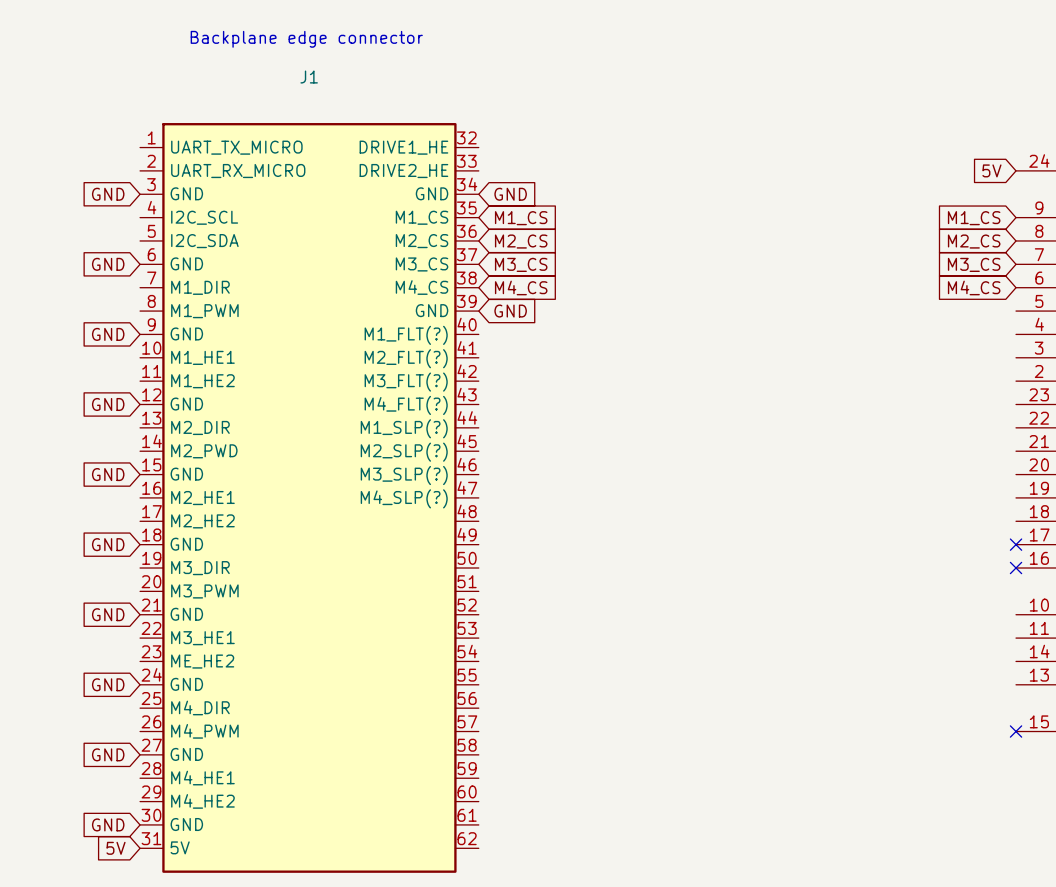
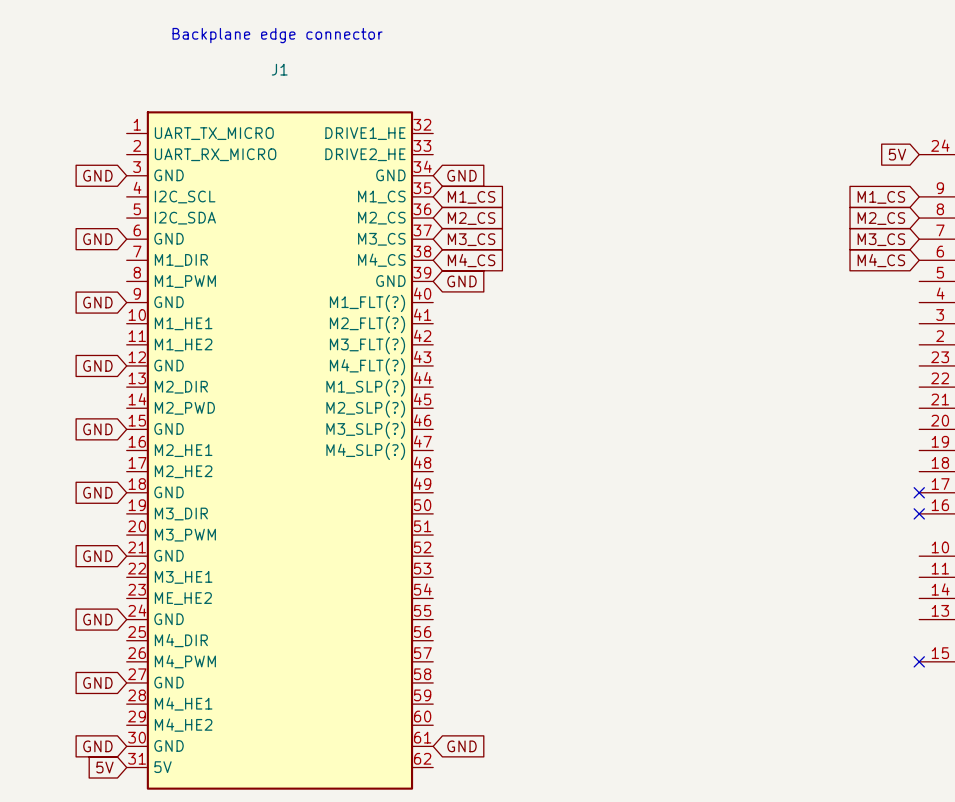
global label: none -> GND (462, 746)

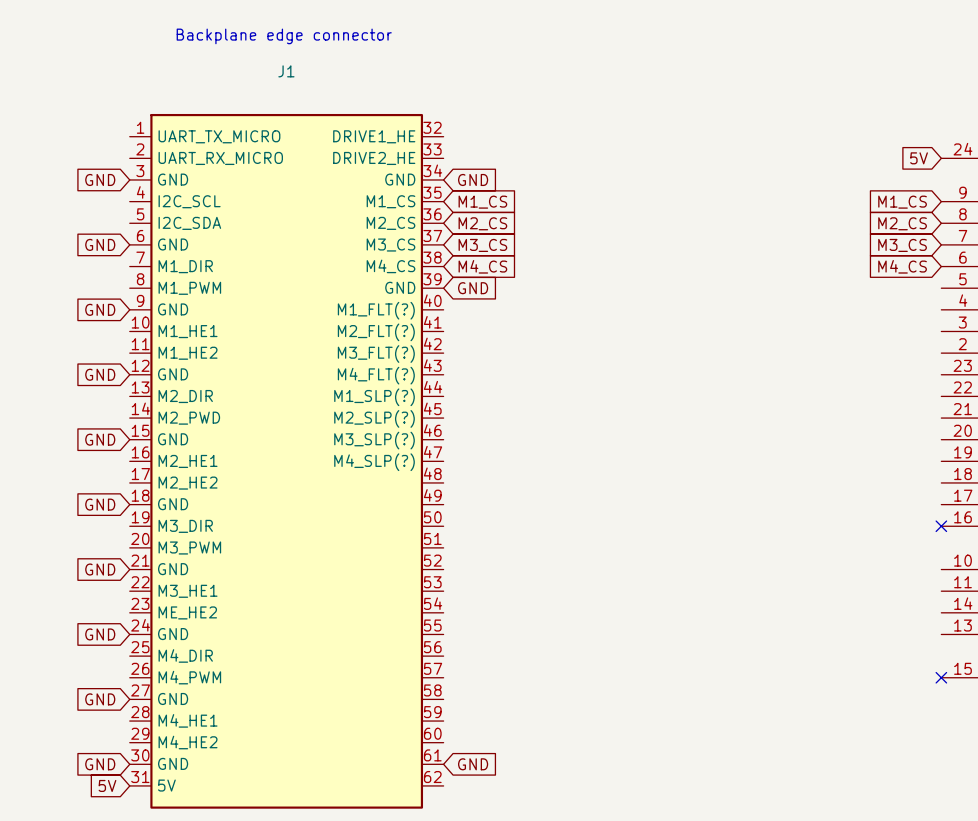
no-connect mark: (919, 492) -> none

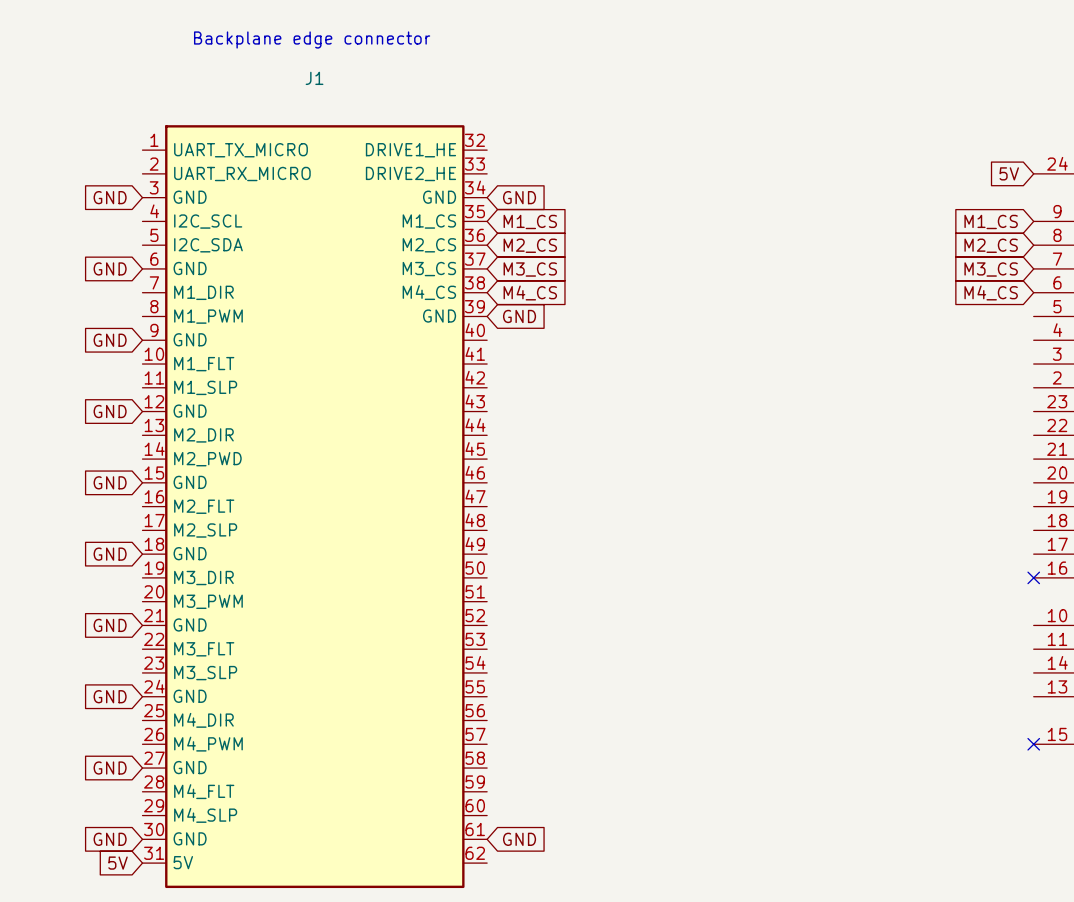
J1 symbol: [129, 113, 444, 809] -> [142, 125, 488, 889]

